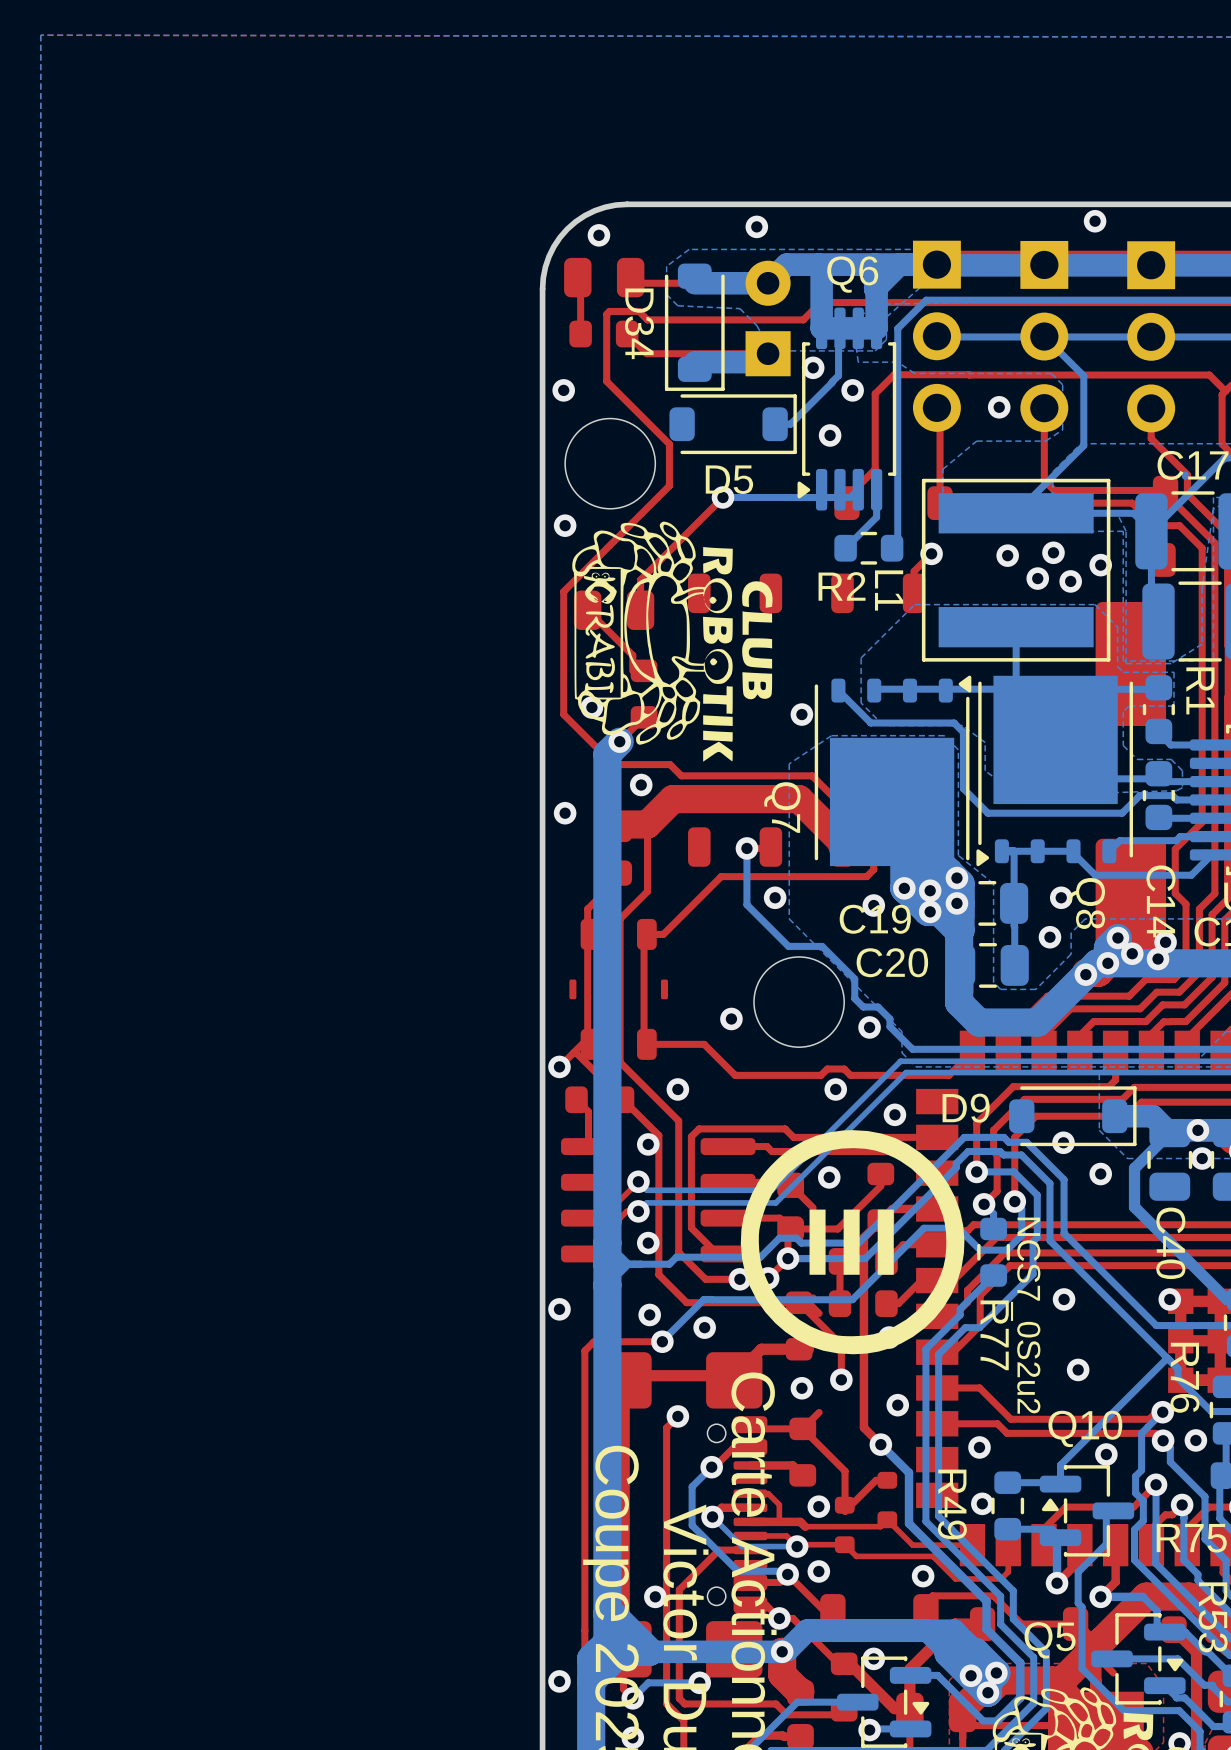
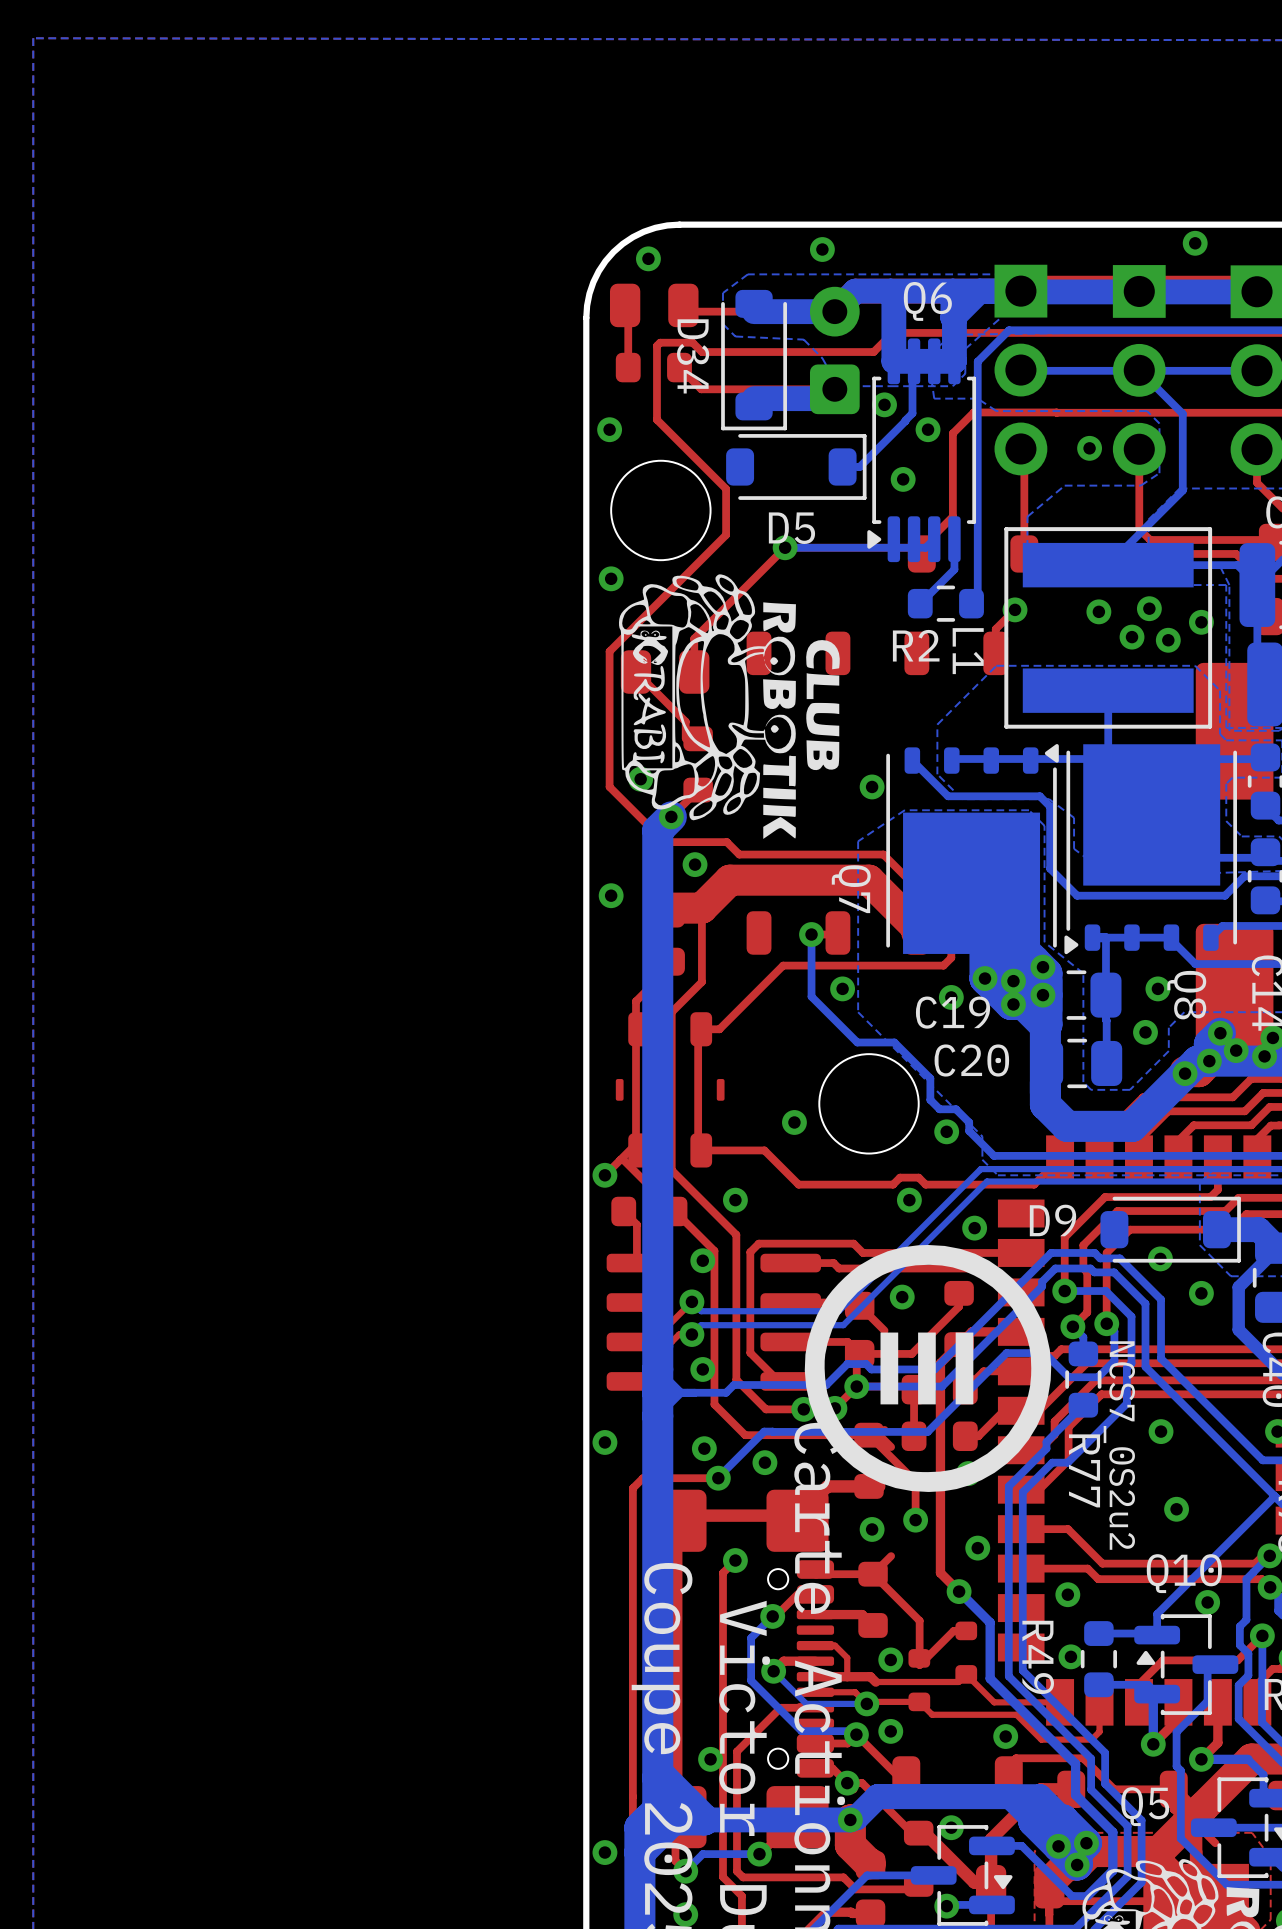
part footprint: [745, 260, 791, 377] -> [809, 286, 860, 415]

